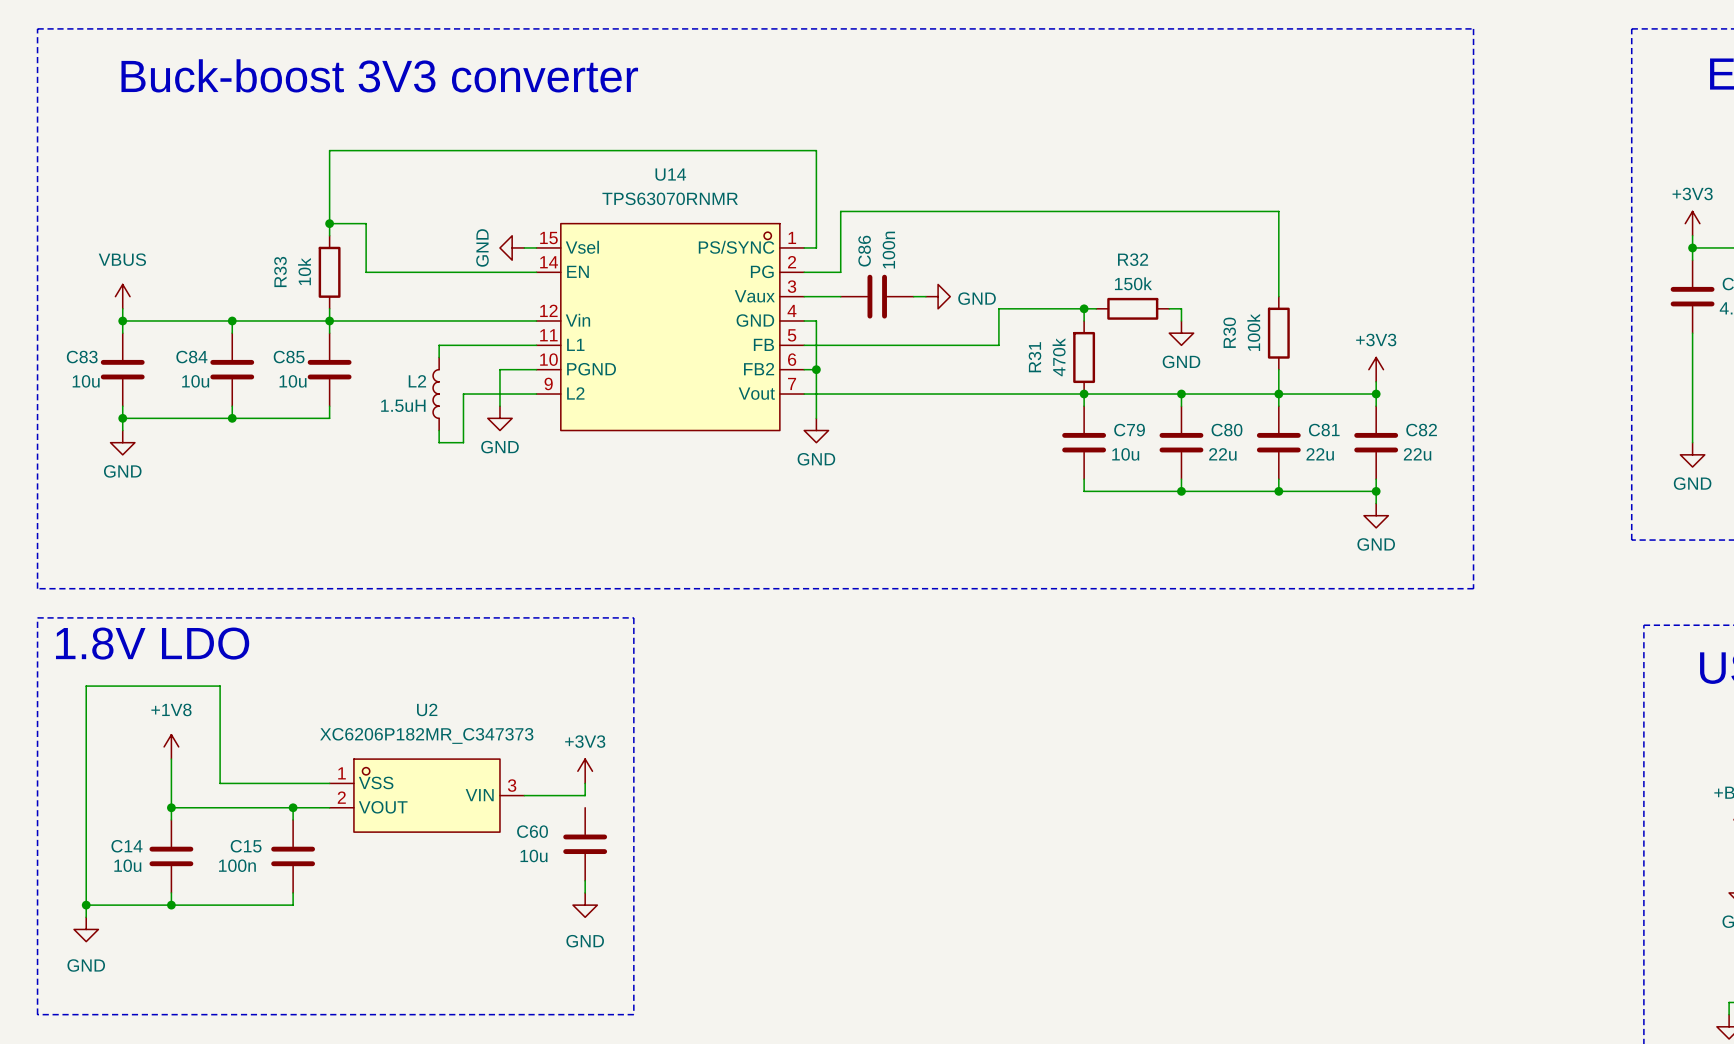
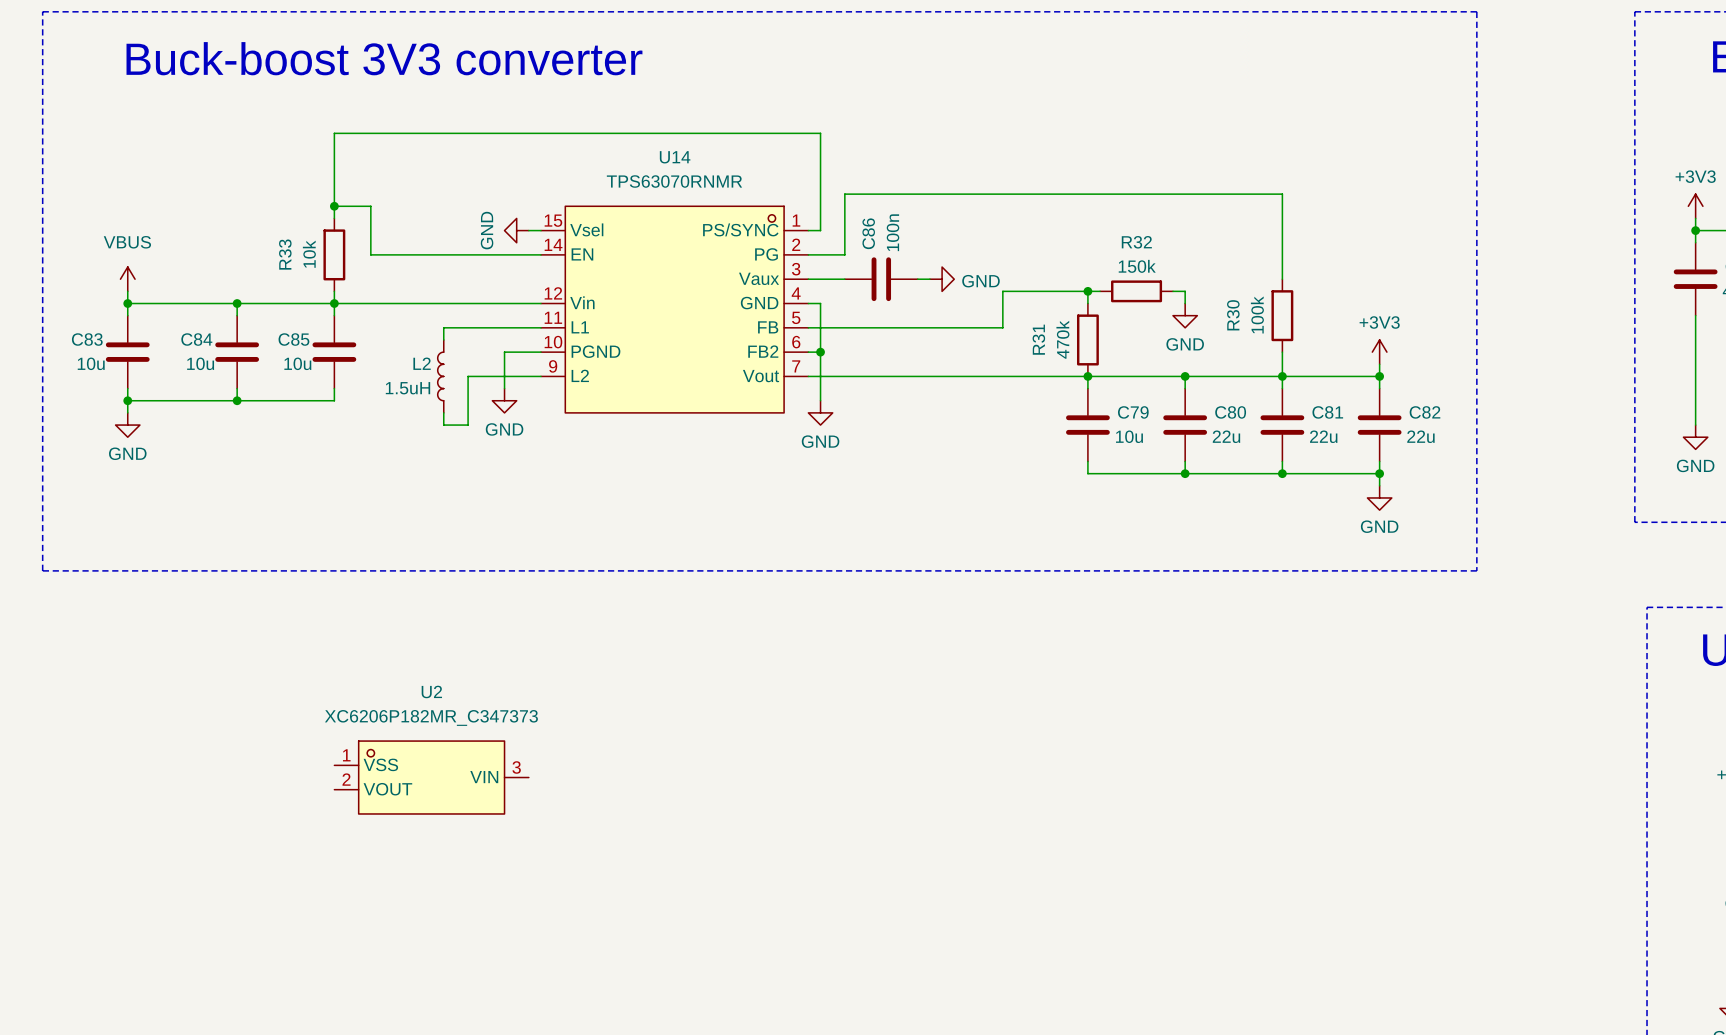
line: (37, 617) (633, 617) (633, 1014) (37, 1014) (37, 617) -> none
text: 1.8V LDO (152, 643) -> none
power symbol: +1V8 (171, 746) -> none
wire: (171, 759) (171, 819) -> none
power symbol: +3V3 (585, 771) -> none
wire: (329, 783) (220, 783) (220, 686) (86, 686) (86, 917) -> none
wire: (585, 783) (585, 795) (524, 795) -> none
wire: (171, 807) (329, 807) -> none
junction: (171, 807) -> none
wire: (293, 807) (293, 819) -> none
junction: (293, 807) -> none
C60: 10u (585, 844) -> none
C14: 10u (171, 856) -> none
C15: 100n (293, 856) -> none
wire: (585, 880) (585, 892) -> none
wire: (171, 892) (171, 905) -> none
wire: (293, 892) (293, 905) (86, 905) -> none
junction: (86, 905) -> none
junction: (171, 905) -> none
power symbol: GND (585, 905) -> none
power symbol: GND (86, 929) -> none

